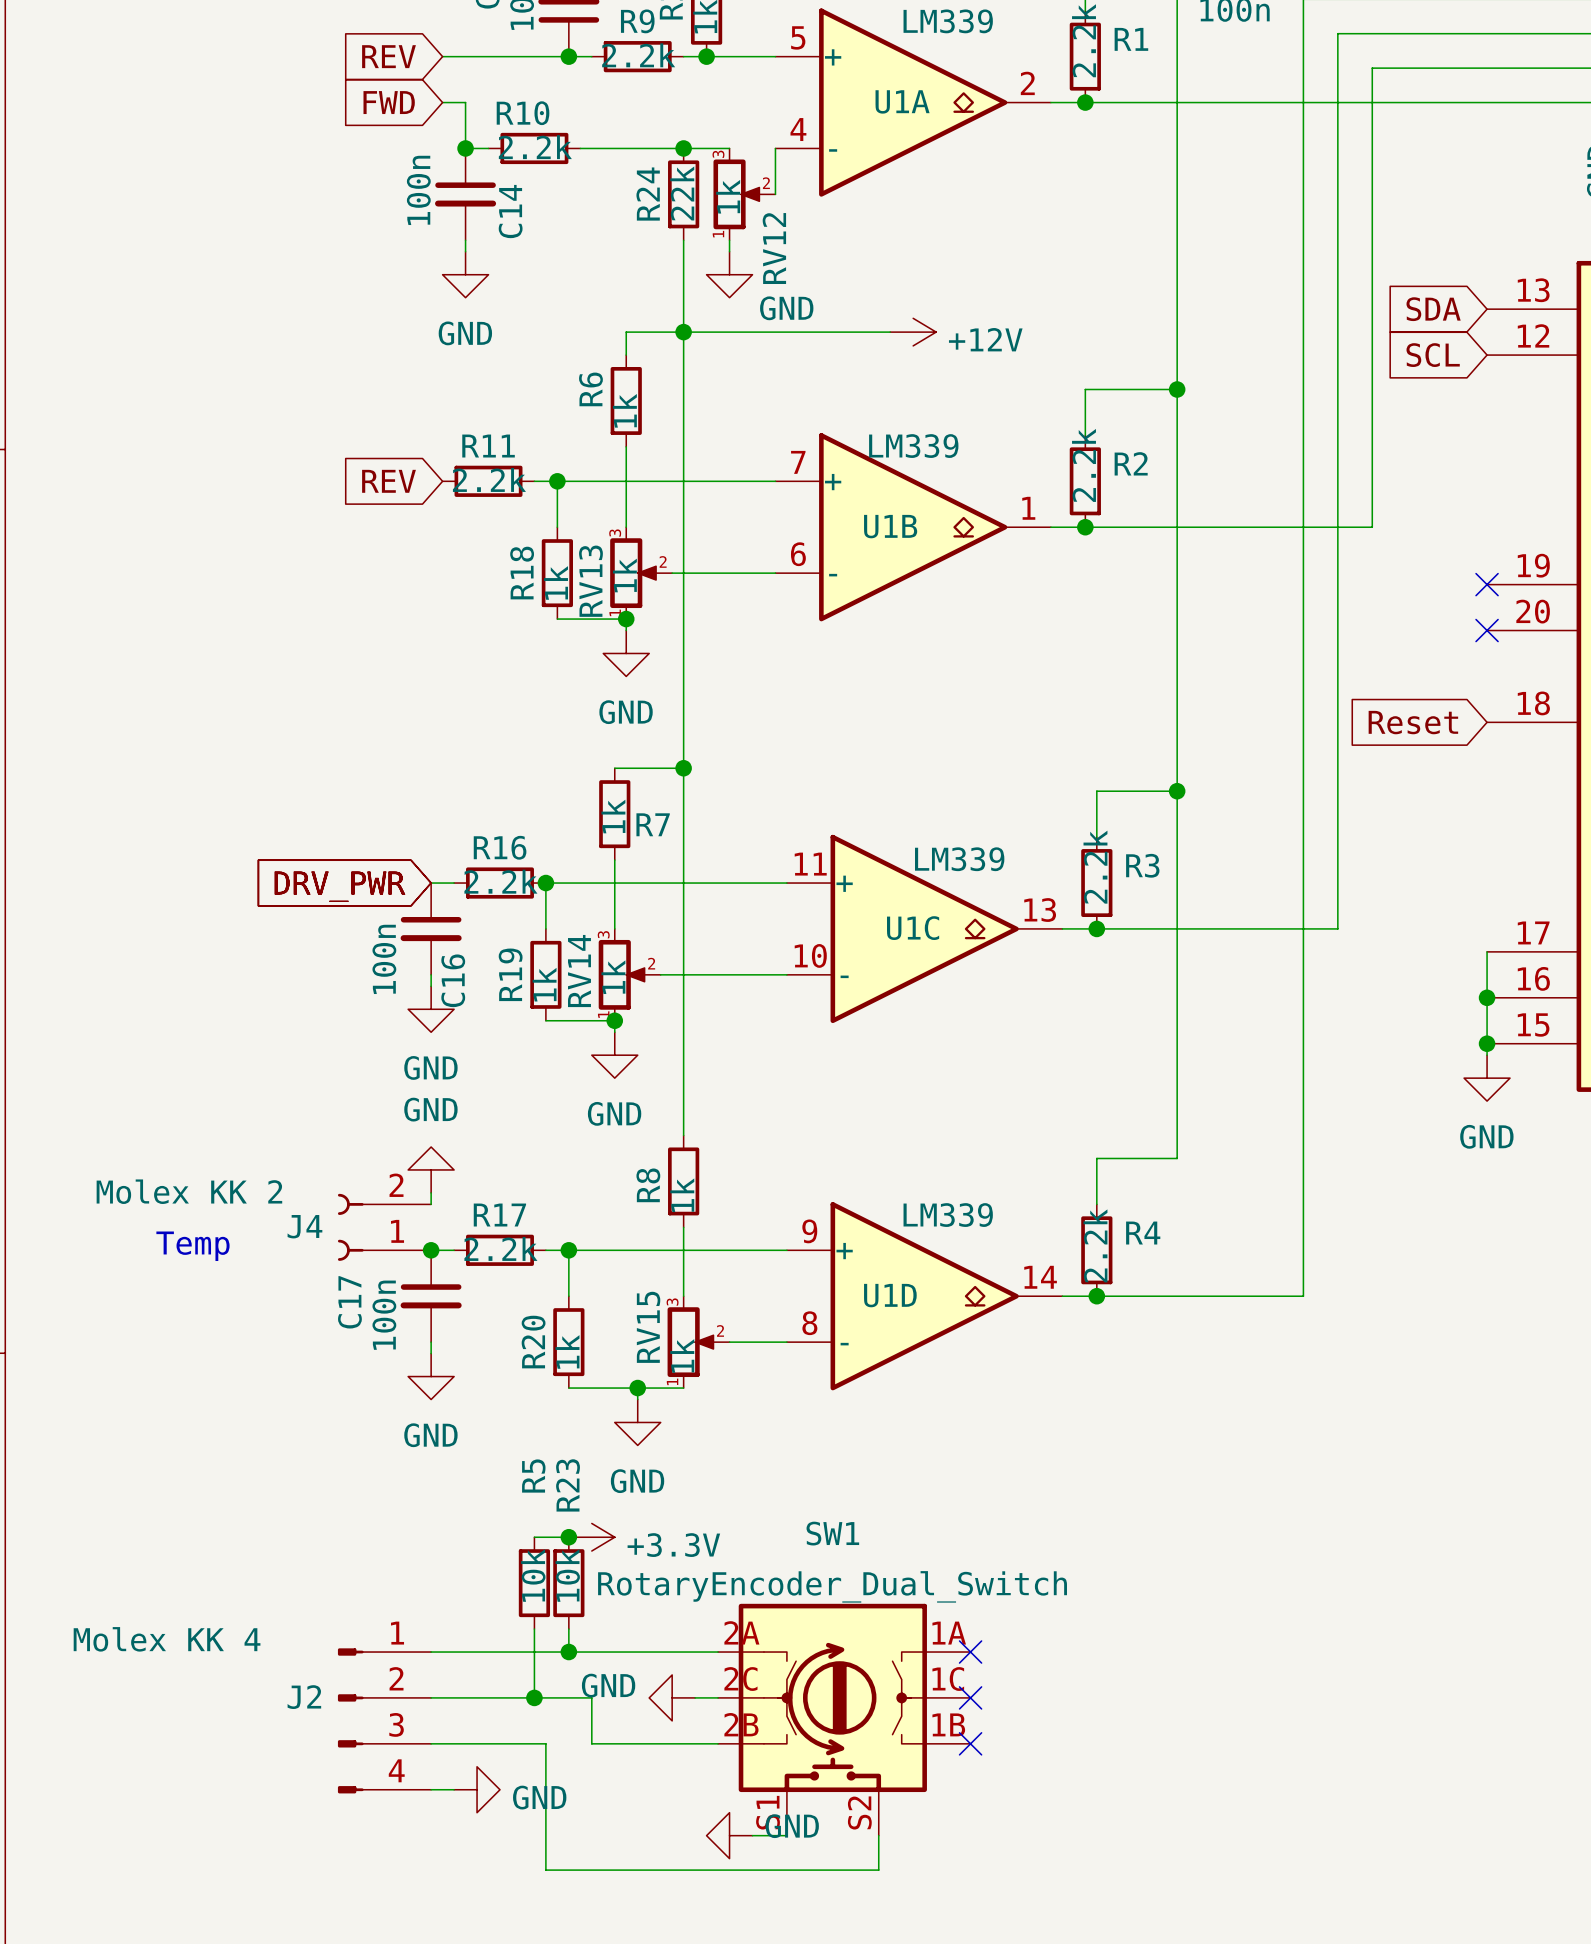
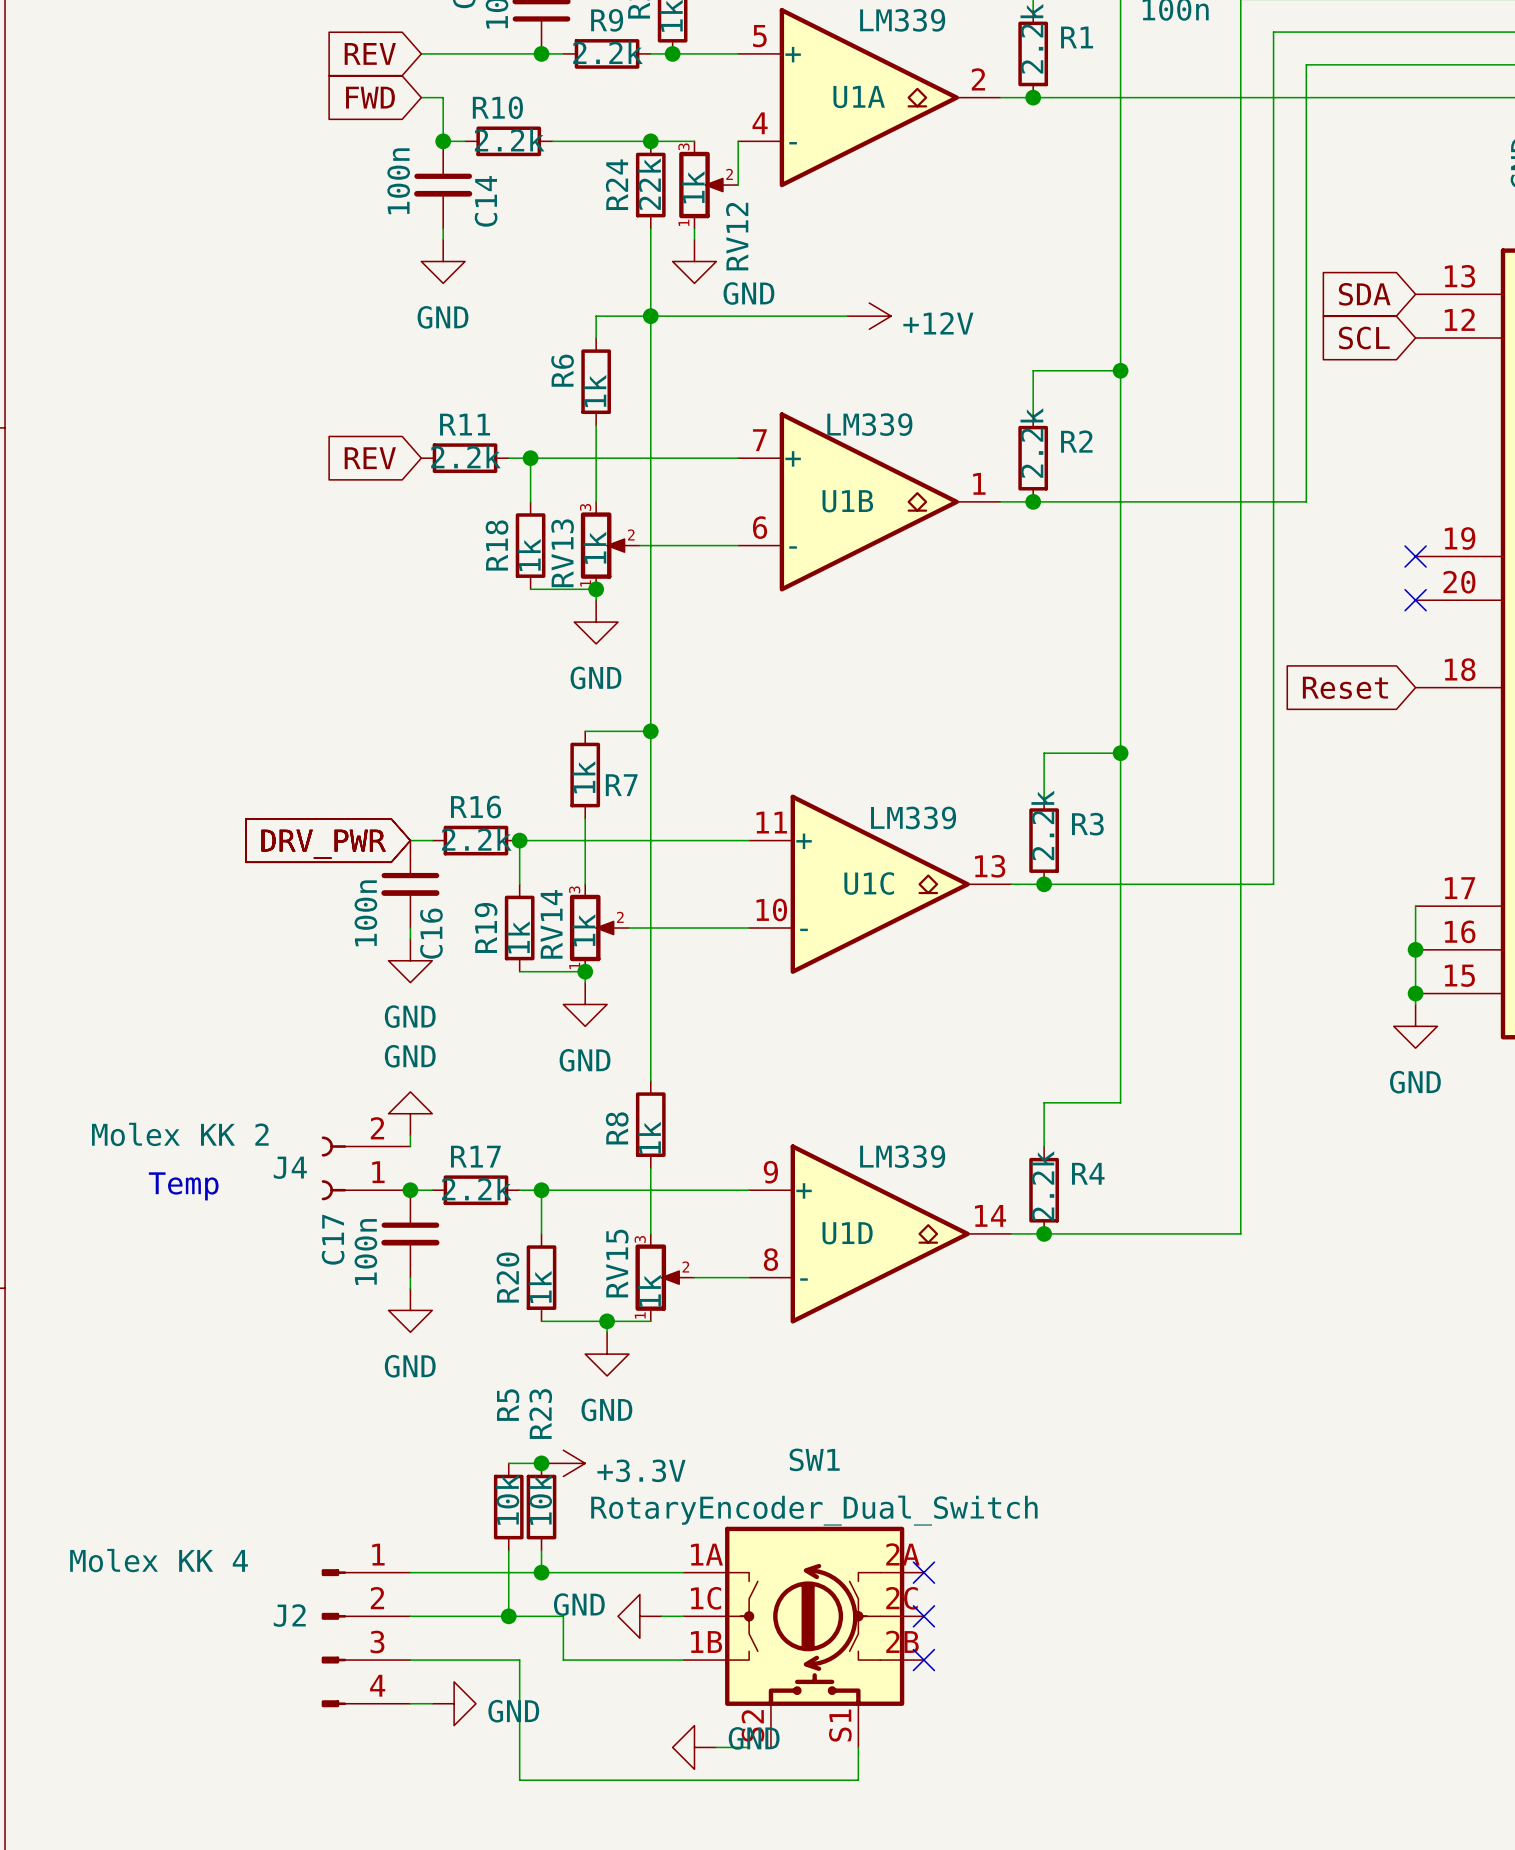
SW1 flip: as is (832, 1697) -> left-right (814, 1616)
wire: (878, 1835) (878, 1870) -> (858, 1747) (858, 1780) (836, 1780)

